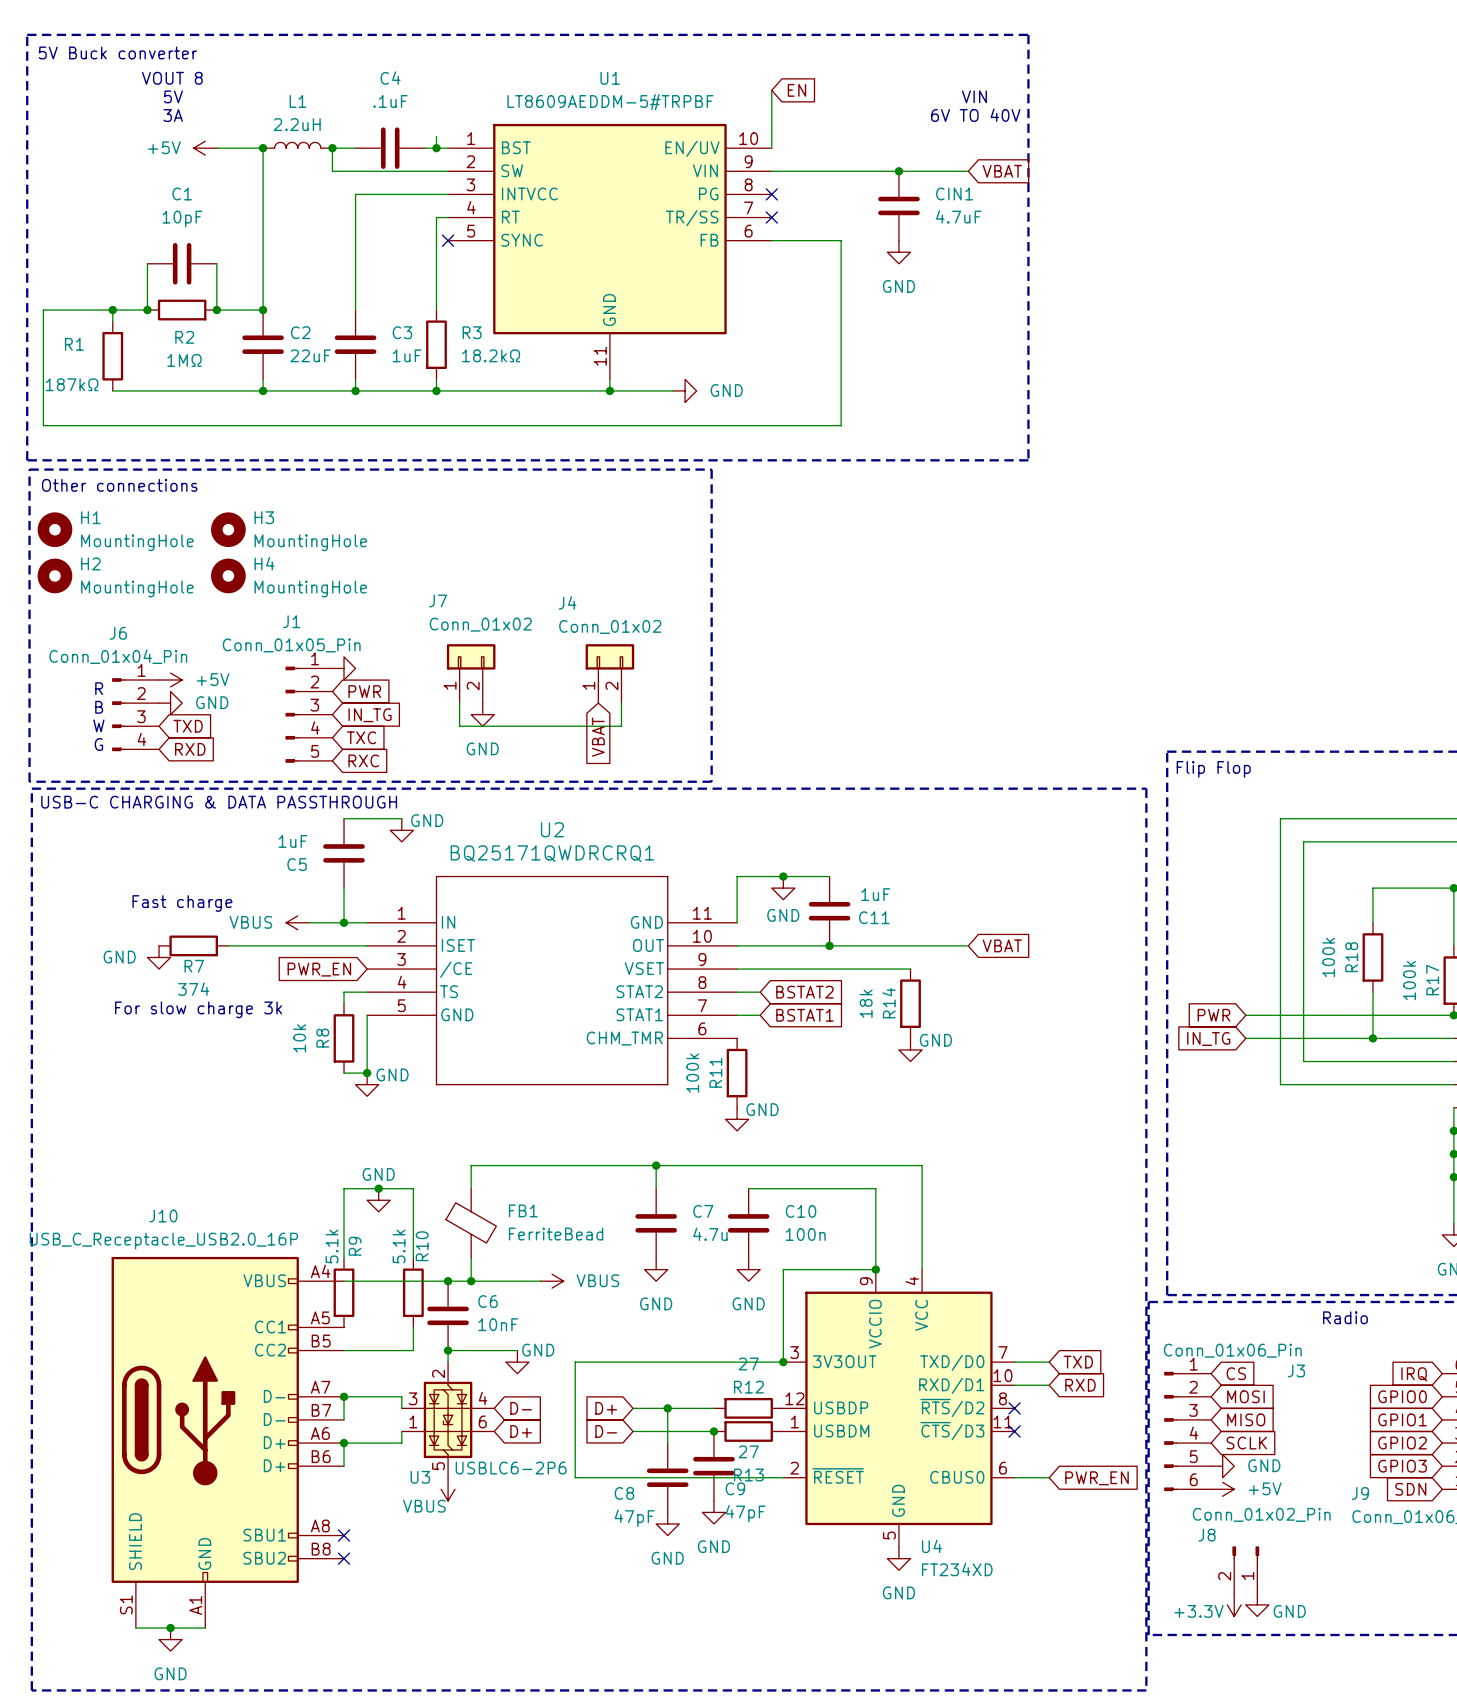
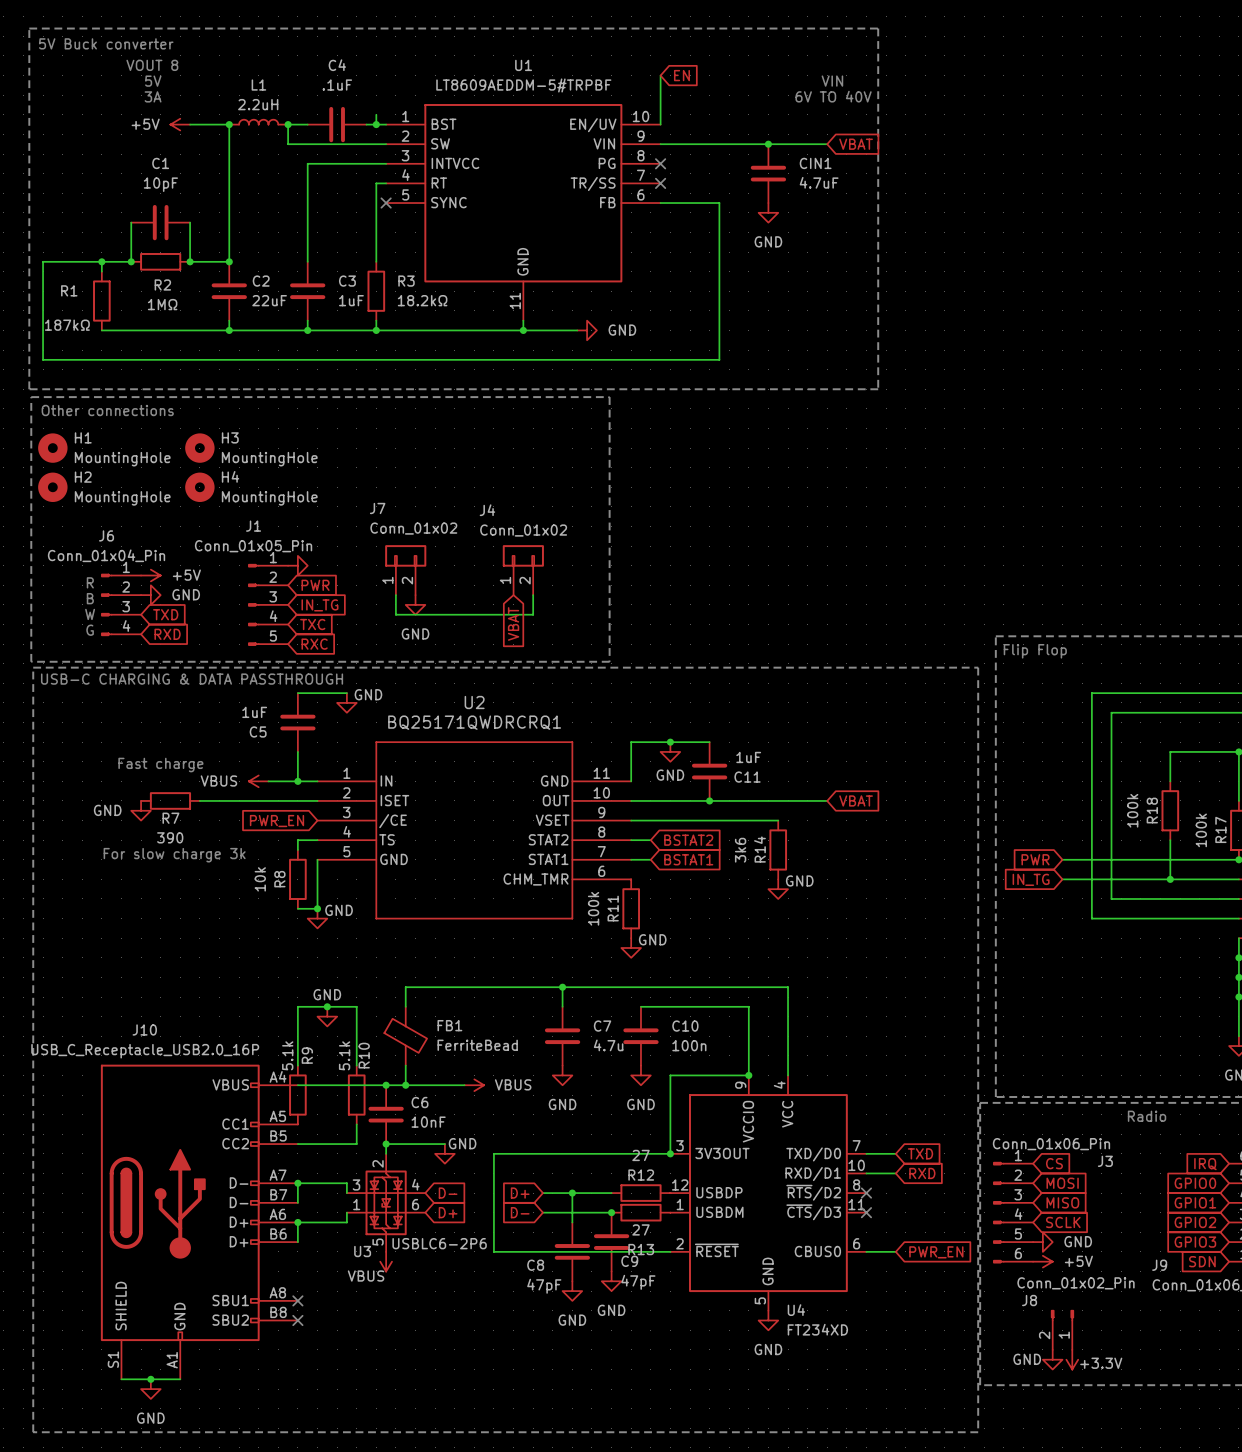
R7 value: 374 (193, 989) -> 390 (170, 837)
R14 value: 18k (866, 1003) -> 3k6 (740, 850)
power symbol: +3.3V (1234, 1604) -> GND (1052, 1359)
power symbol: GND (1257, 1604) -> +3.3V (1072, 1359)

